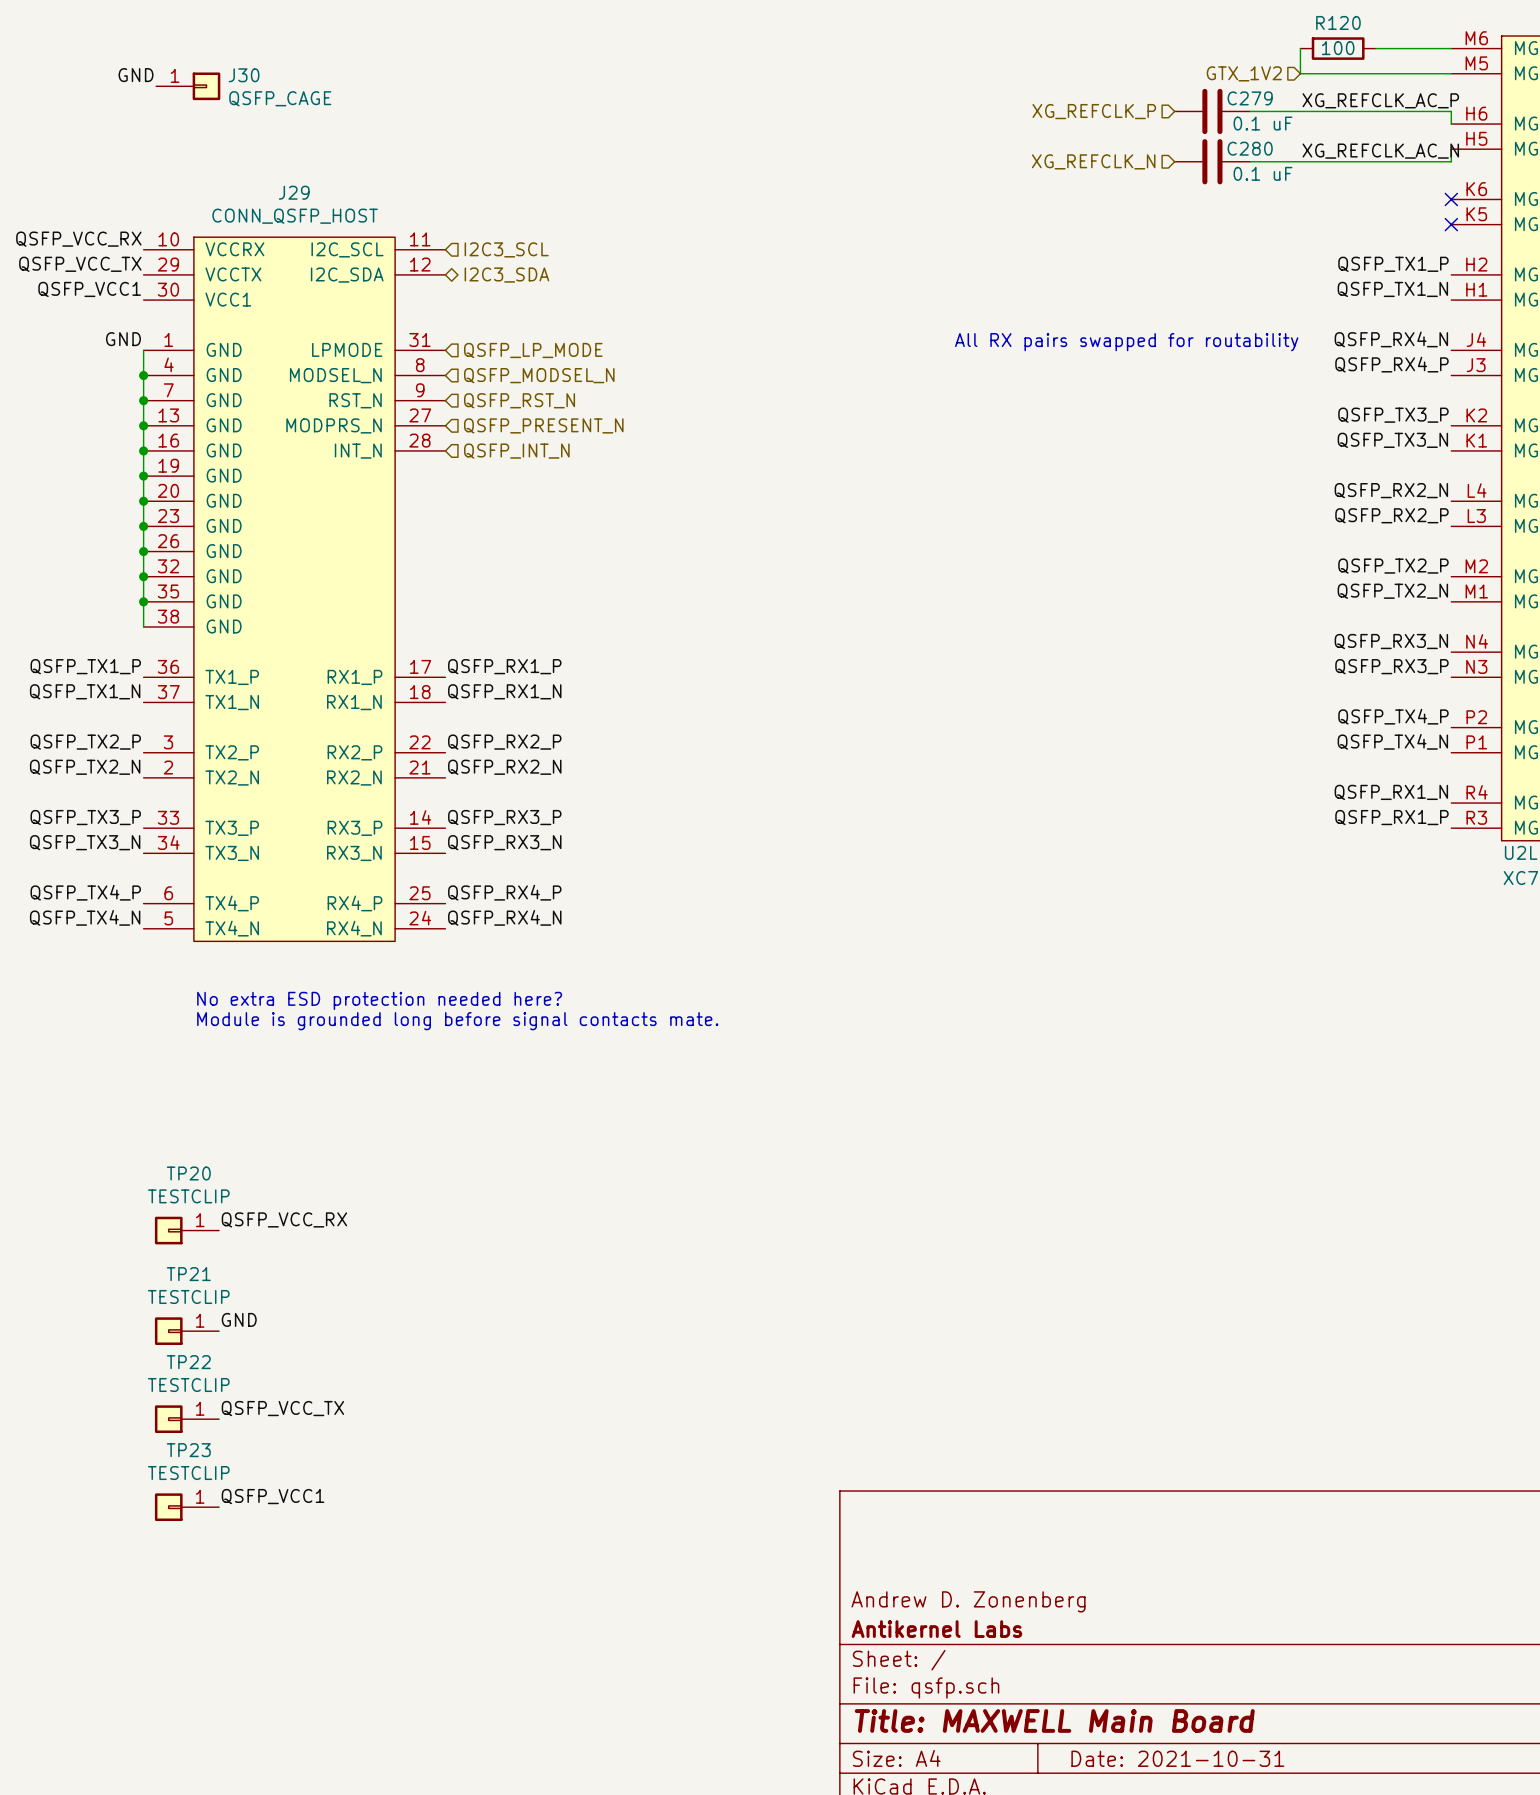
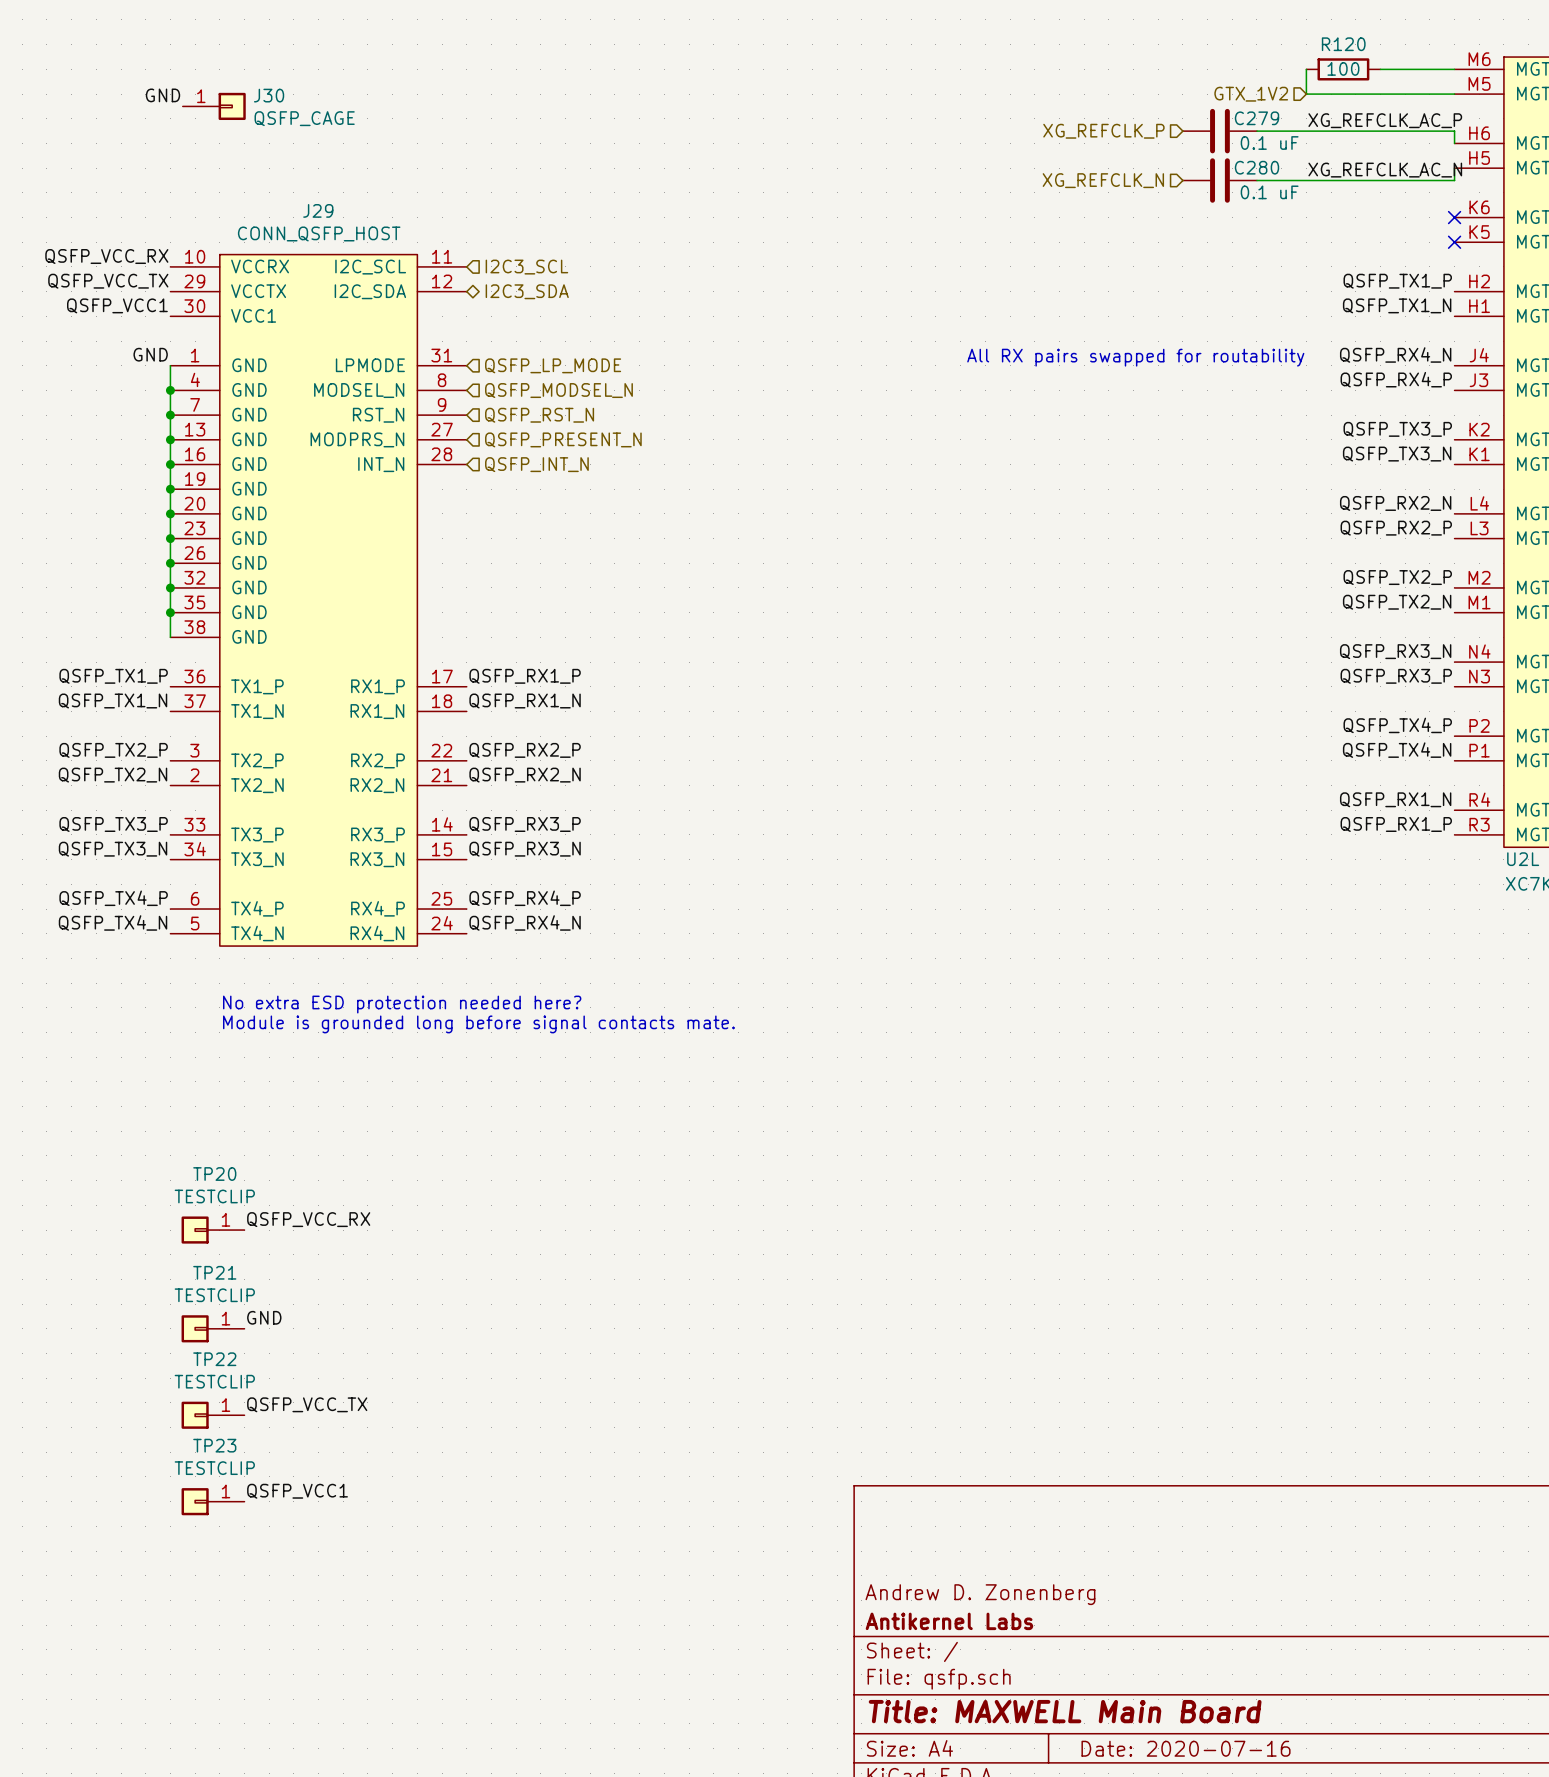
title block: Date: 2021-10-31 (1177, 1758) -> Date: 2020-07-16 (1186, 1748)

